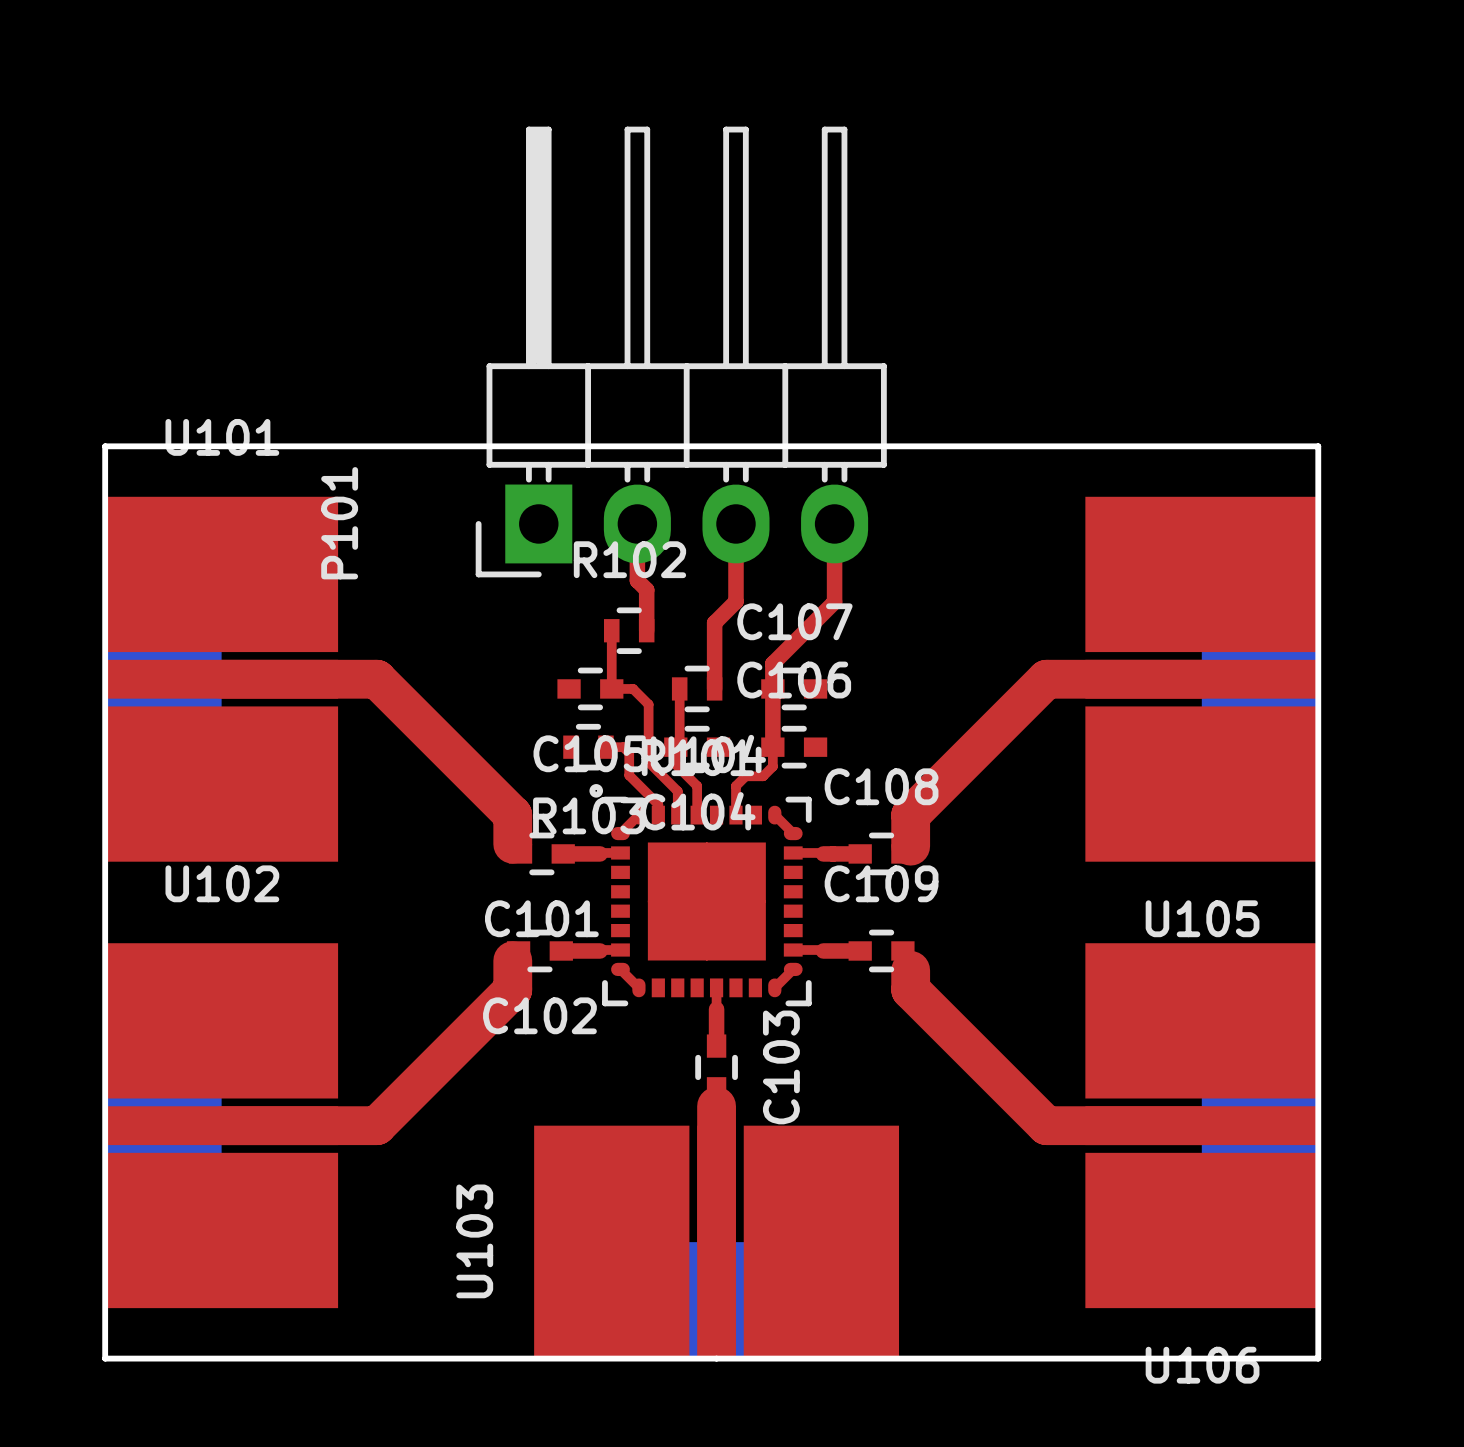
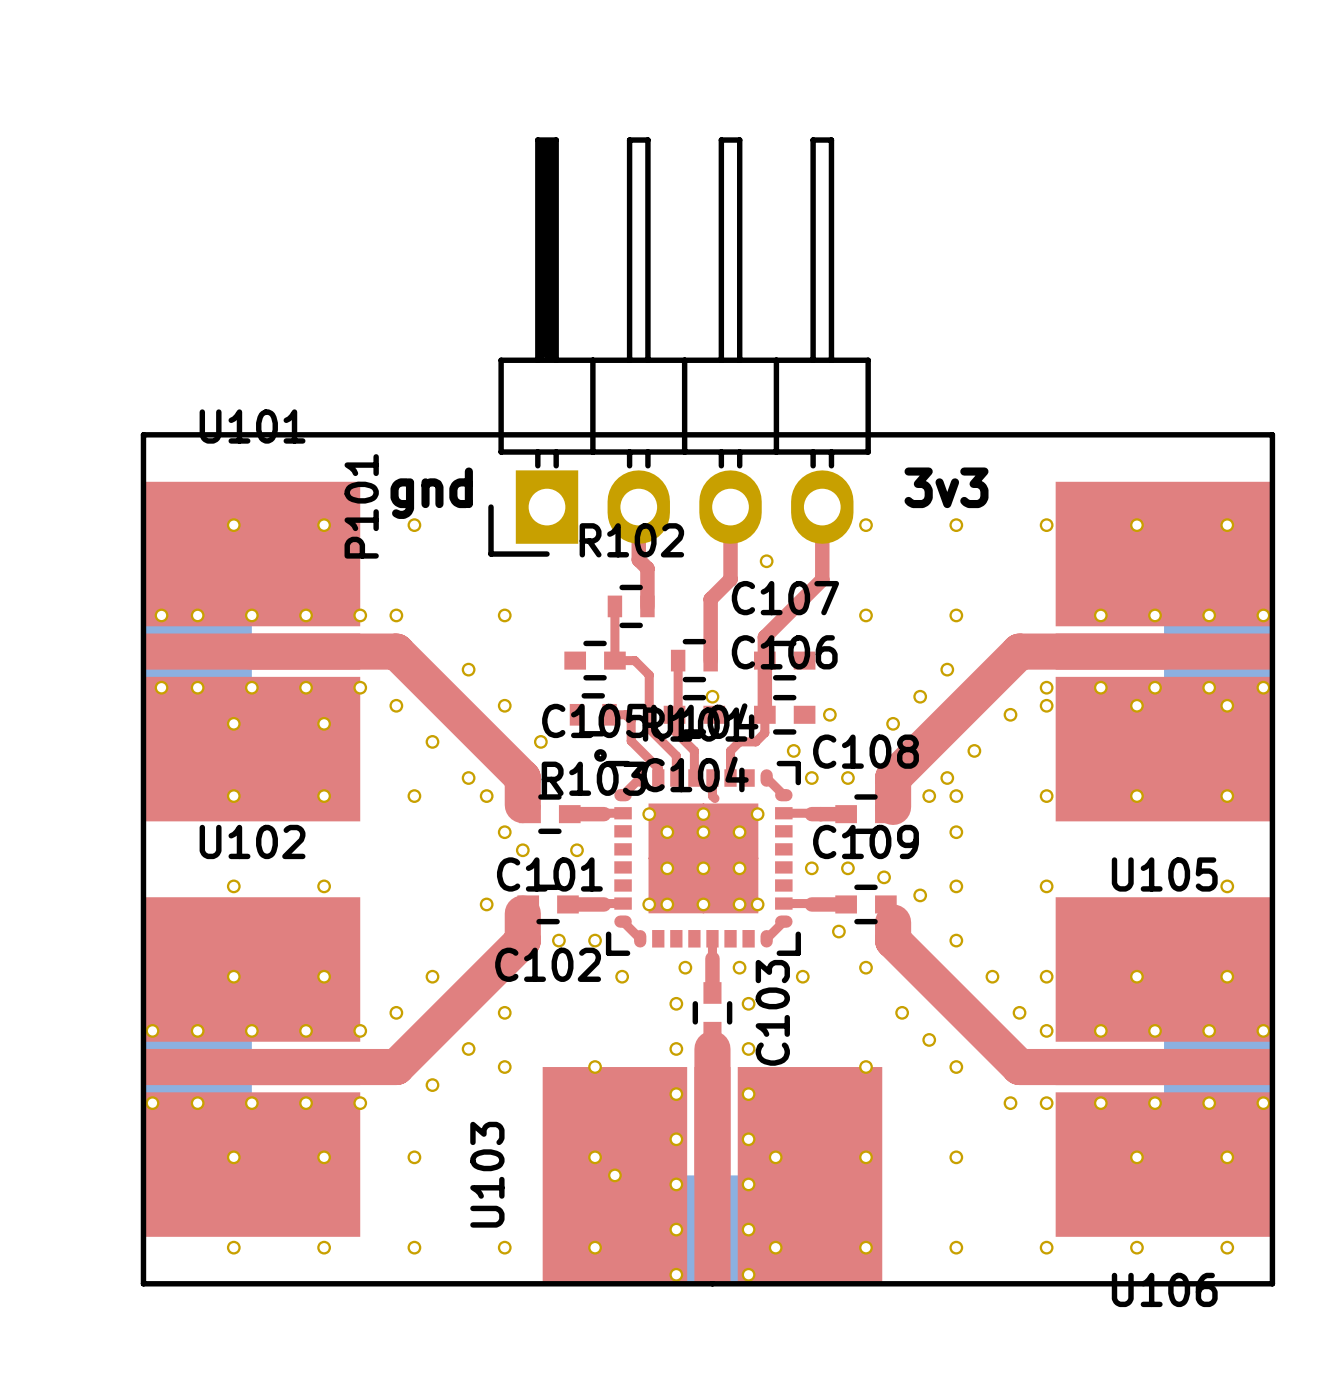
text: none -> 3v3 (946, 487)
text: none -> gnd (431, 493)
part: none -> (233, 525)
part: none -> (324, 525)
part: none -> (414, 525)
part: none -> (866, 525)
part: none -> (956, 525)
part: none -> (1046, 525)
part: none -> (1136, 525)
part: none -> (1227, 525)
part: none -> (766, 561)
part: none -> (161, 615)
part: none -> (197, 615)
part: none -> (251, 615)
part: none -> (306, 615)
part: none -> (360, 615)
part: none -> (396, 615)
part: none -> (504, 615)
part: none -> (866, 615)
part: none -> (956, 615)
part: none -> (1100, 615)
part: none -> (1155, 615)
part: none -> (1209, 615)
part: none -> (1263, 615)
part: none -> (468, 669)
part: none -> (947, 669)
part: none -> (161, 687)
part: none -> (197, 687)
part: none -> (251, 687)
part: none -> (306, 687)
part: none -> (360, 687)
part: none -> (1046, 687)
part: none -> (1100, 687)
part: none -> (1155, 687)
part: none -> (1209, 687)
part: none -> (1263, 687)
part: none -> (712, 696)
part: none -> (920, 696)
part: none -> (396, 705)
part: none -> (504, 705)
part: none -> (1046, 705)
part: none -> (1136, 705)
part: none -> (1227, 705)
part: none -> (829, 714)
part: none -> (1010, 714)
part: none -> (233, 723)
part: none -> (324, 723)
part: none -> (893, 723)
part: none -> (432, 741)
part: none -> (540, 741)
part: none -> (793, 750)
part: none -> (974, 750)
part: none -> (468, 778)
top track: none -> (712, 778) (712, 795) (714, 798)
part: none -> (811, 778)
part: none -> (847, 778)
part: none -> (947, 778)
part: none -> (233, 796)
part: none -> (324, 796)
part: none -> (414, 796)
part: none -> (486, 796)
part: none -> (929, 796)
part: none -> (956, 796)
part: none -> (1046, 796)
part: none -> (1136, 796)
part: none -> (1227, 796)
part: none -> (649, 814)
part: none -> (703, 814)
part: none -> (757, 814)
part: none -> (504, 832)
part: none -> (667, 832)
part: none -> (703, 832)
part: none -> (739, 832)
part: none -> (956, 832)
part: none -> (522, 850)
part: none -> (576, 850)
part: none -> (667, 868)
part: none -> (703, 868)
part: none -> (739, 868)
part: none -> (811, 868)
part: none -> (847, 868)
part: none -> (884, 877)
part: none -> (233, 886)
part: none -> (324, 886)
part: none -> (956, 886)
part: none -> (1046, 886)
part: none -> (1227, 886)
part: none -> (920, 895)
part: none -> (486, 904)
part: none -> (649, 904)
part: none -> (667, 904)
part: none -> (703, 904)
part: none -> (739, 904)
part: none -> (757, 904)
part: none -> (838, 931)
part: none -> (558, 940)
part: none -> (595, 940)
part: none -> (956, 940)
part: none -> (685, 967)
part: none -> (739, 967)
part: none -> (866, 967)
part: none -> (233, 976)
part: none -> (324, 976)
part: none -> (432, 976)
part: none -> (622, 976)
part: none -> (802, 976)
part: none -> (992, 976)
part: none -> (1046, 976)
part: none -> (1136, 976)
part: none -> (1227, 976)
part: none -> (676, 1003)
part: none -> (748, 1003)
part: none -> (396, 1012)
part: none -> (504, 1012)
part: none -> (902, 1012)
part: none -> (1019, 1012)
part: none -> (152, 1030)
part: none -> (197, 1030)
part: none -> (251, 1030)
part: none -> (306, 1030)
part: none -> (360, 1030)
part: none -> (1046, 1030)
part: none -> (1100, 1030)
part: none -> (1155, 1030)
part: none -> (1209, 1030)
part: none -> (1263, 1030)
part: none -> (929, 1039)
part: none -> (468, 1048)
part: none -> (676, 1048)
part: none -> (748, 1048)
part: none -> (504, 1067)
part: none -> (595, 1067)
part: none -> (866, 1067)
part: none -> (956, 1067)
part: none -> (432, 1085)
part: none -> (676, 1094)
part: none -> (748, 1094)
part: none -> (152, 1103)
part: none -> (197, 1103)
part: none -> (251, 1103)
part: none -> (306, 1103)
part: none -> (360, 1103)
part: none -> (1010, 1103)
part: none -> (1046, 1103)
part: none -> (1100, 1103)
part: none -> (1155, 1103)
part: none -> (1209, 1103)
part: none -> (1263, 1103)
part: none -> (676, 1139)
part: none -> (748, 1139)
part: none -> (233, 1157)
part: none -> (324, 1157)
part: none -> (414, 1157)
part: none -> (595, 1157)
part: none -> (775, 1157)
part: none -> (866, 1157)
part: none -> (956, 1157)
part: none -> (1136, 1157)
part: none -> (1227, 1157)
part: none -> (614, 1175)
part: none -> (676, 1184)
part: none -> (748, 1184)
part: none -> (676, 1229)
part: none -> (748, 1229)
part: none -> (233, 1247)
part: none -> (324, 1247)
part: none -> (414, 1247)
part: none -> (504, 1247)
part: none -> (595, 1247)
part: none -> (775, 1247)
part: none -> (866, 1247)
part: none -> (956, 1247)
part: none -> (1046, 1247)
part: none -> (1136, 1247)
part: none -> (1227, 1247)
part: none -> (676, 1274)
part: none -> (748, 1274)

